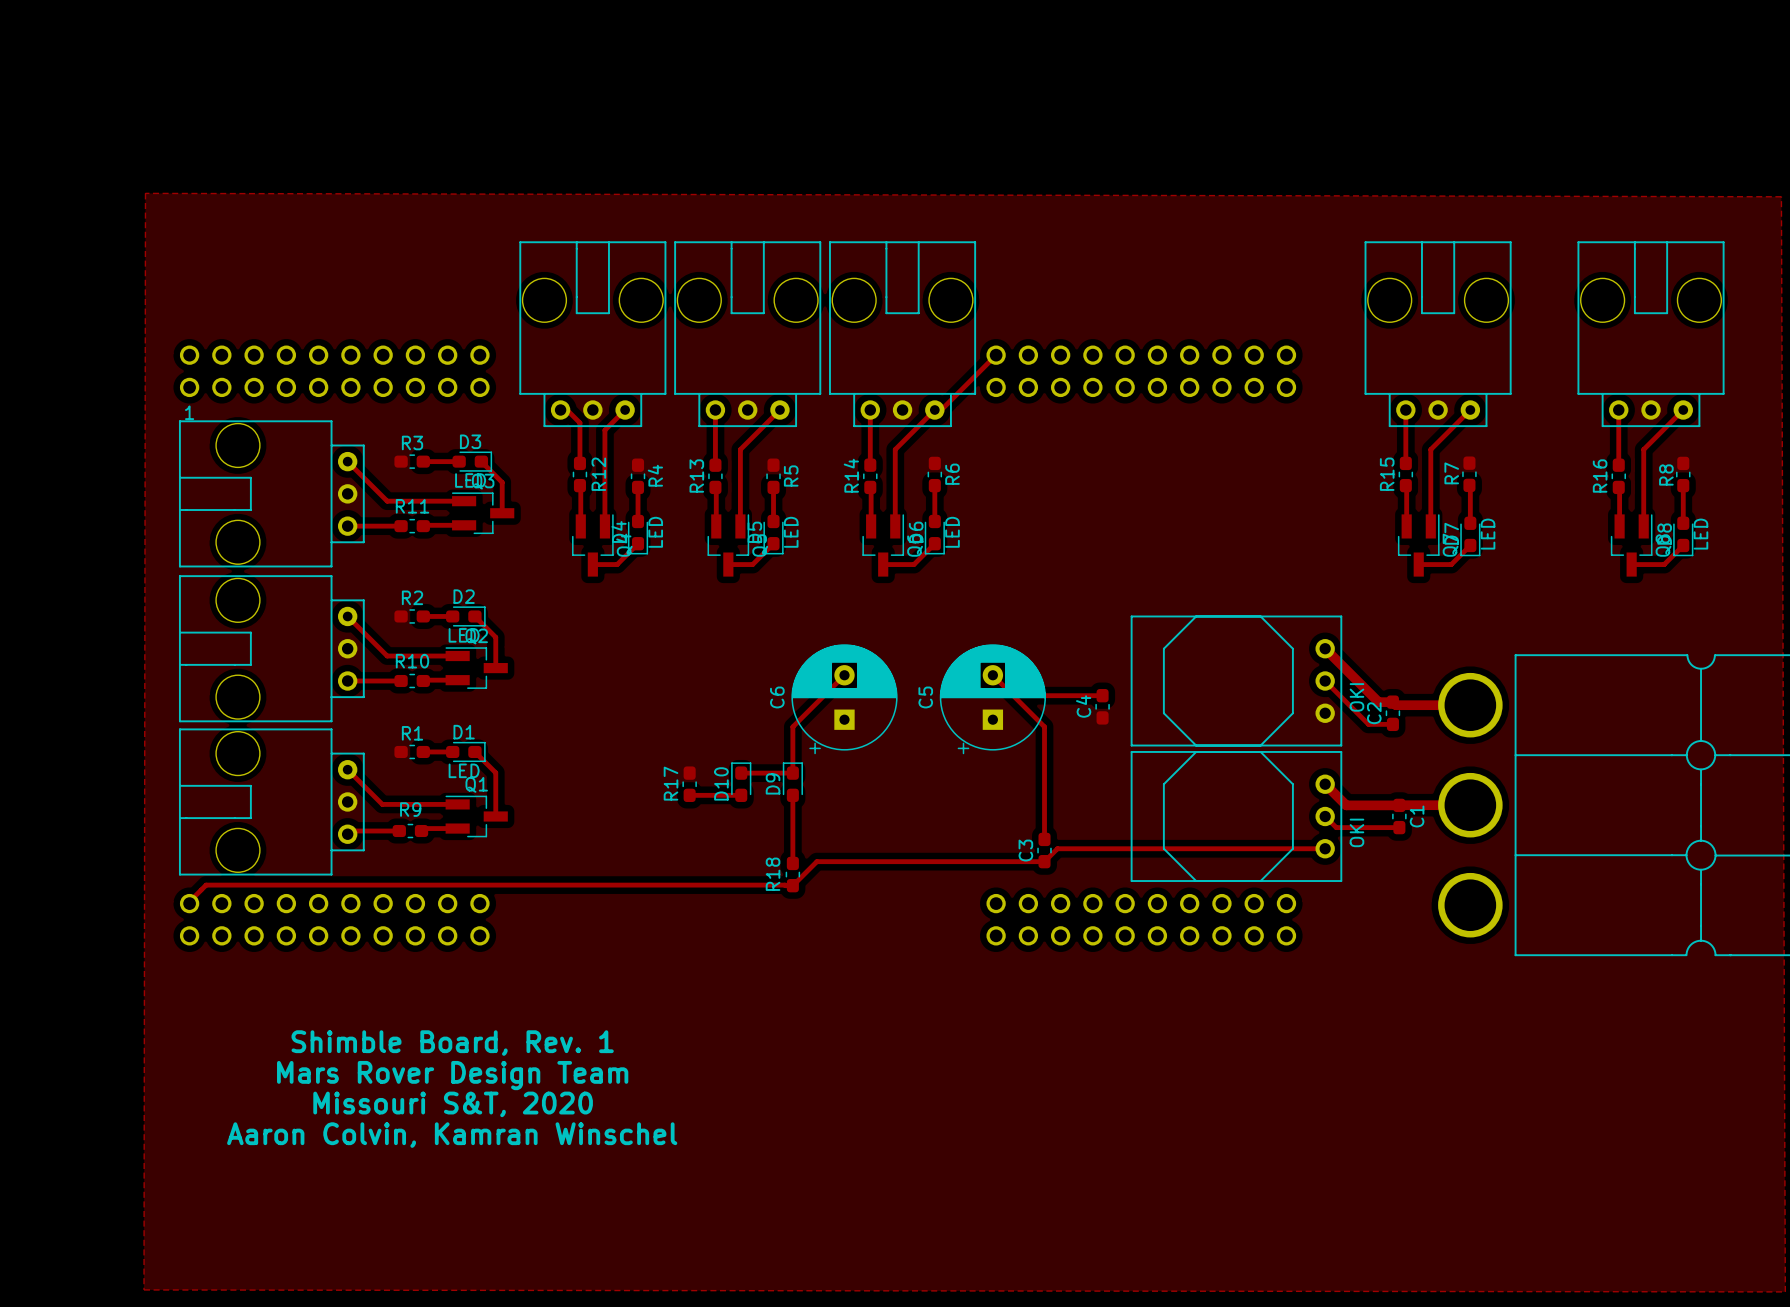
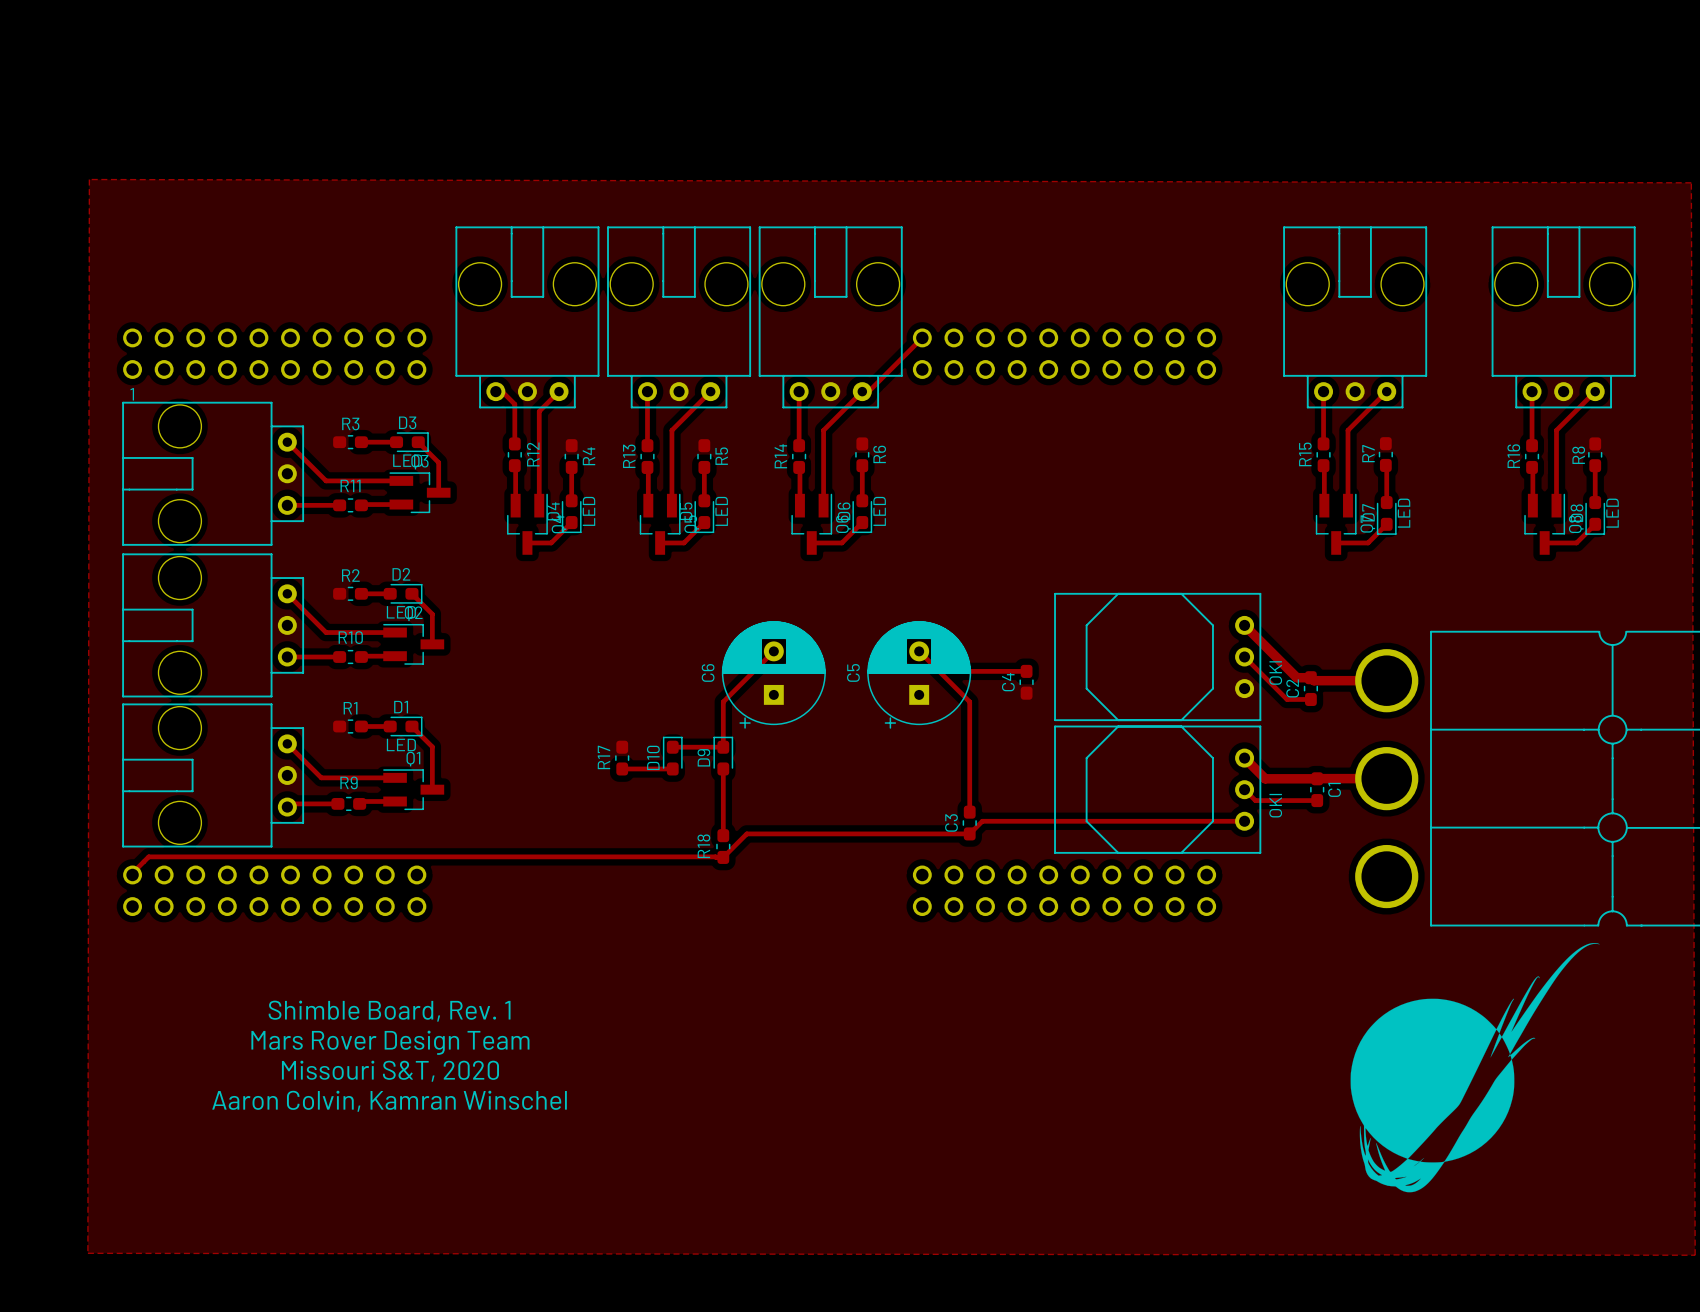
drawing: none -> [1350, 943, 1600, 1193]

